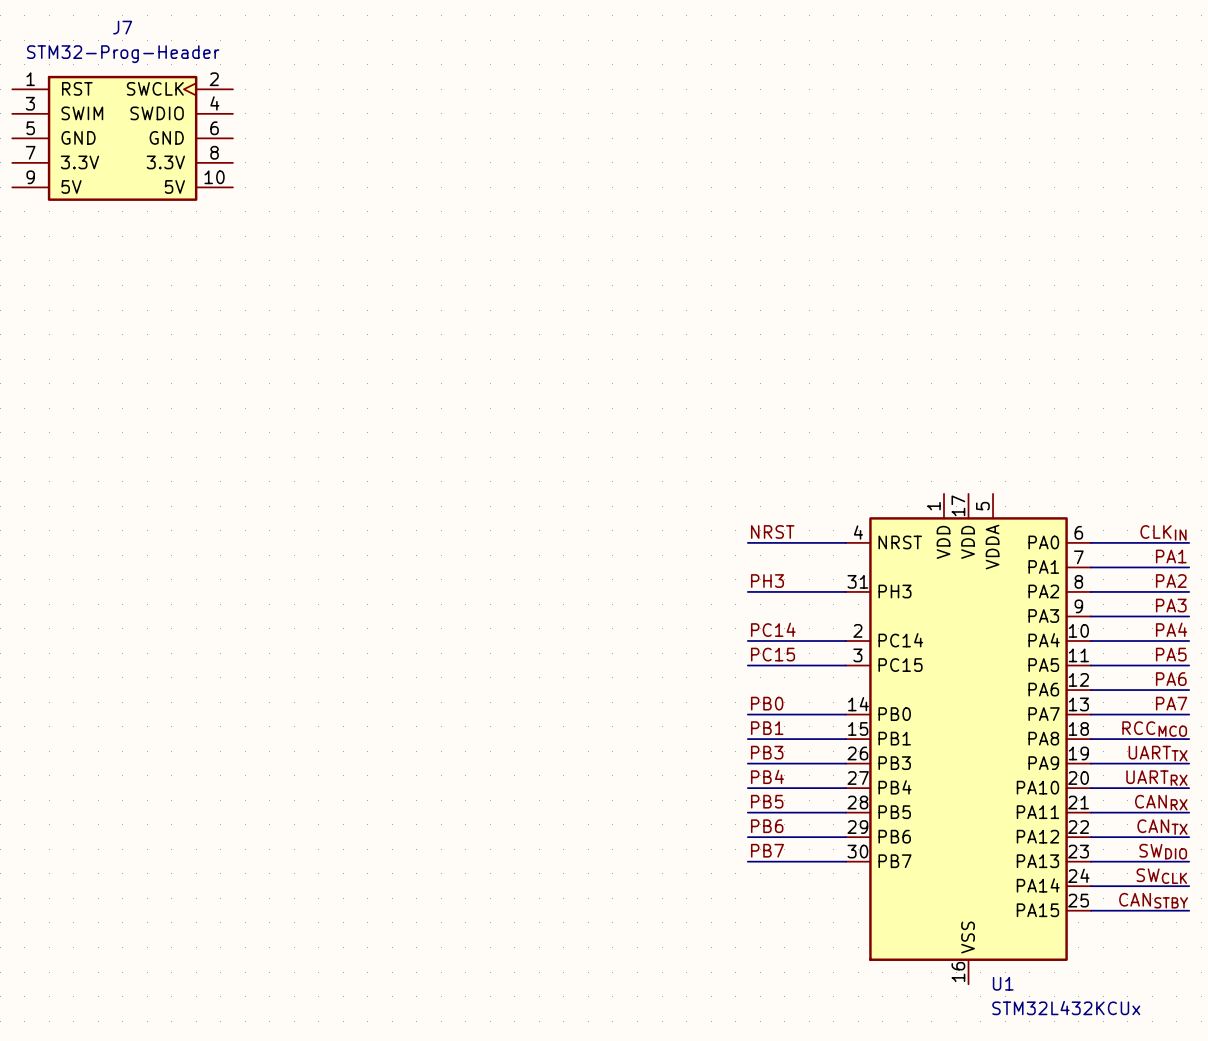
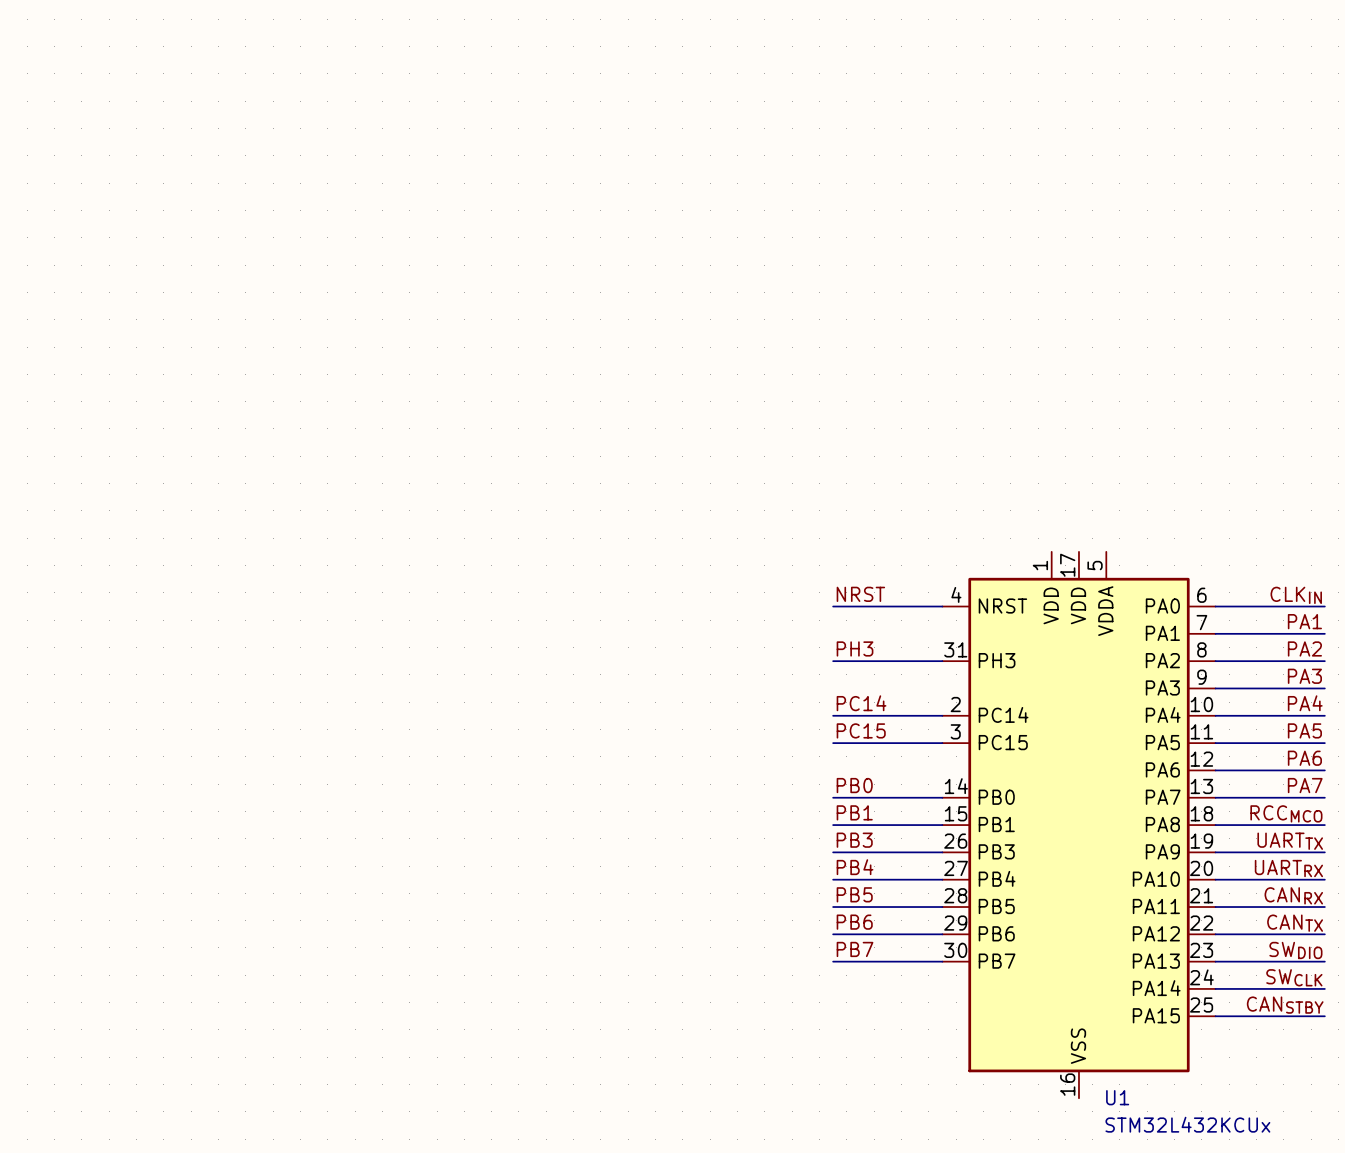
J7: STM32-Prog-Header (122, 138) -> none

